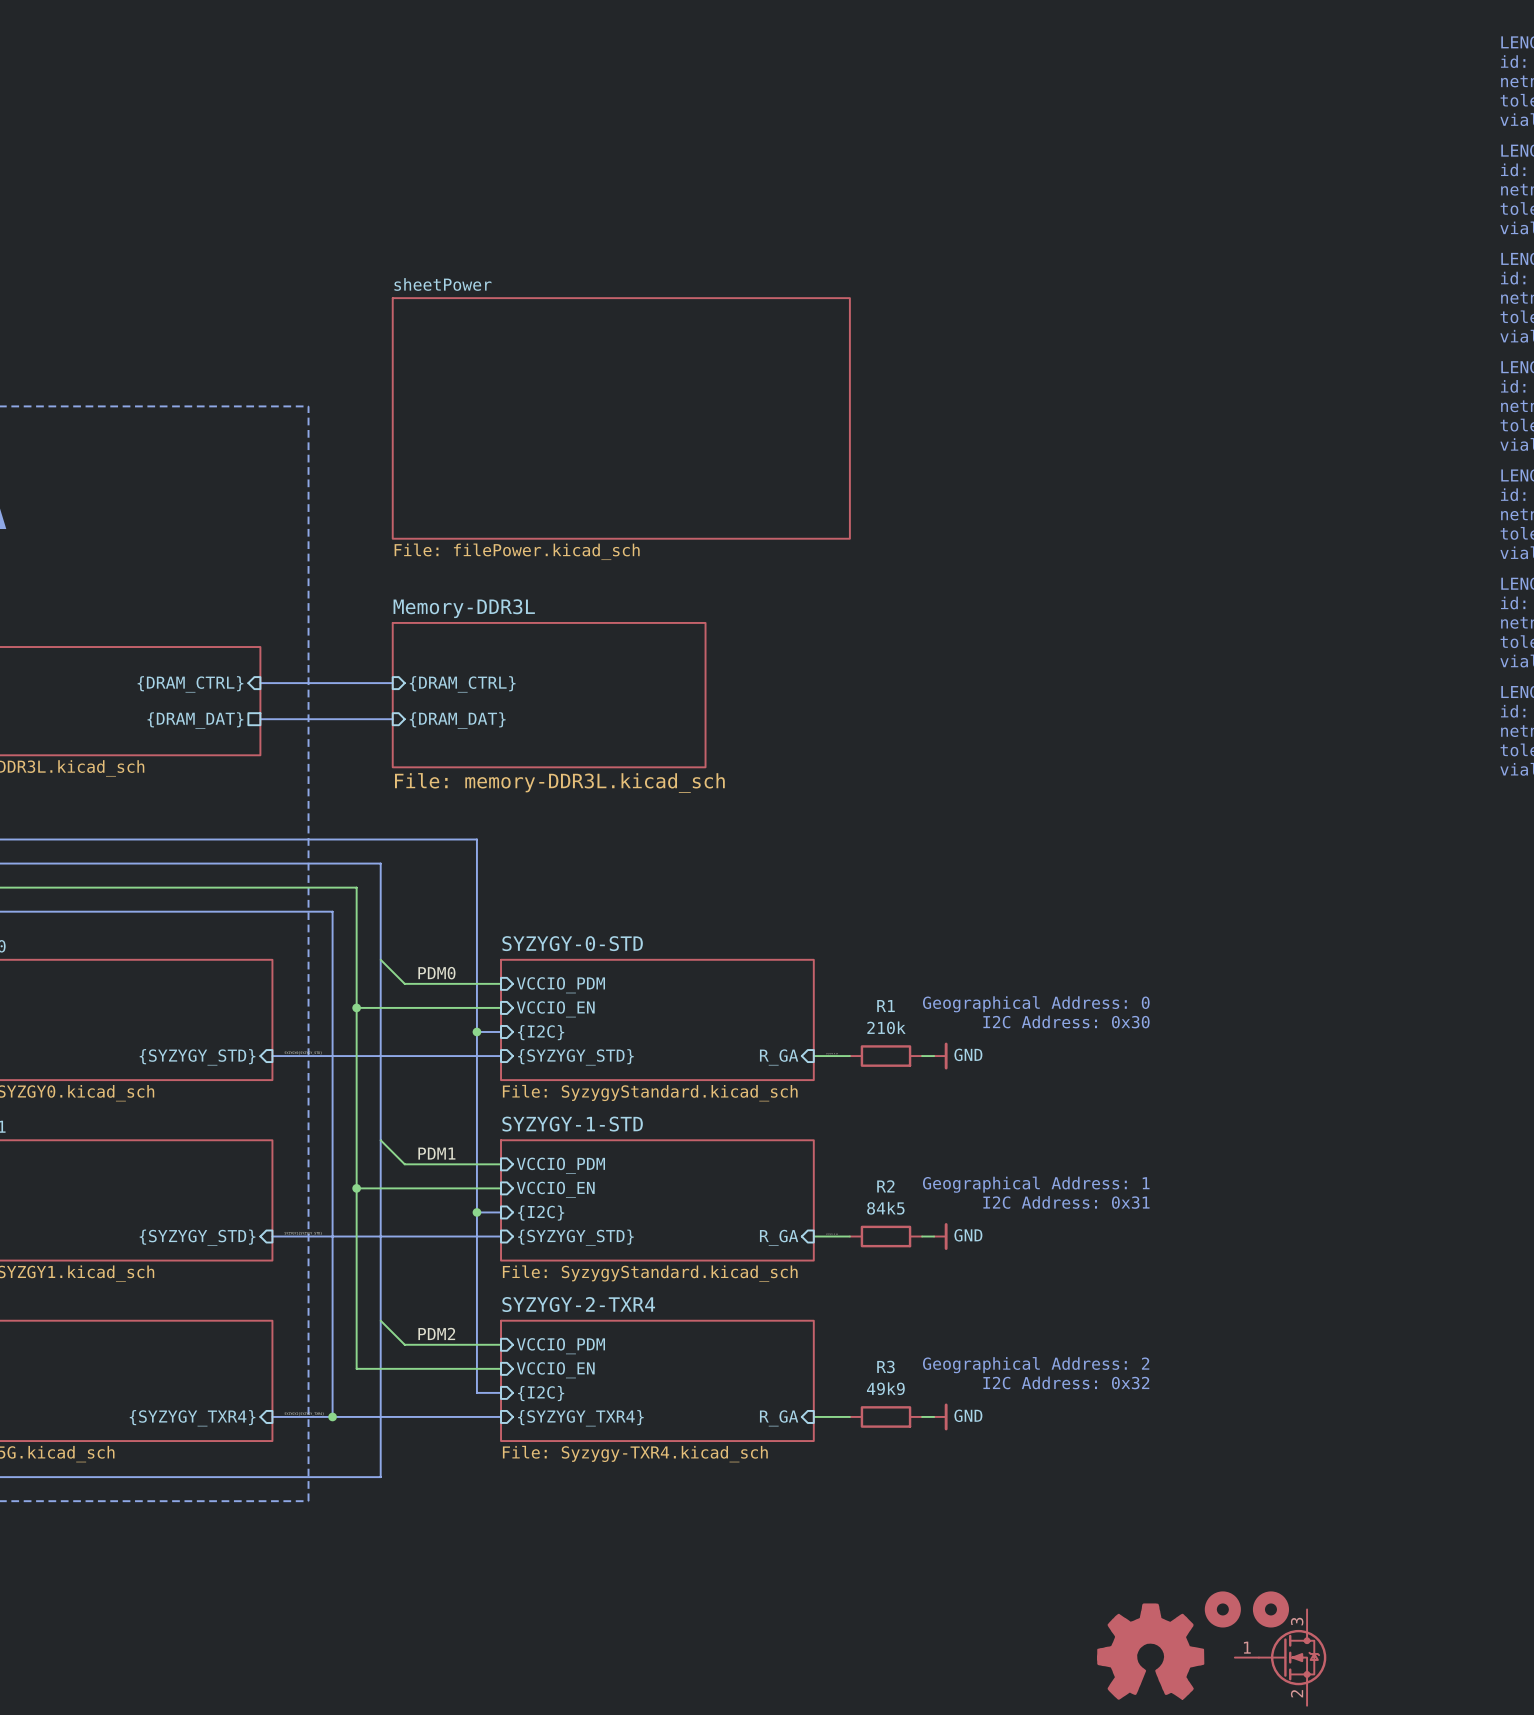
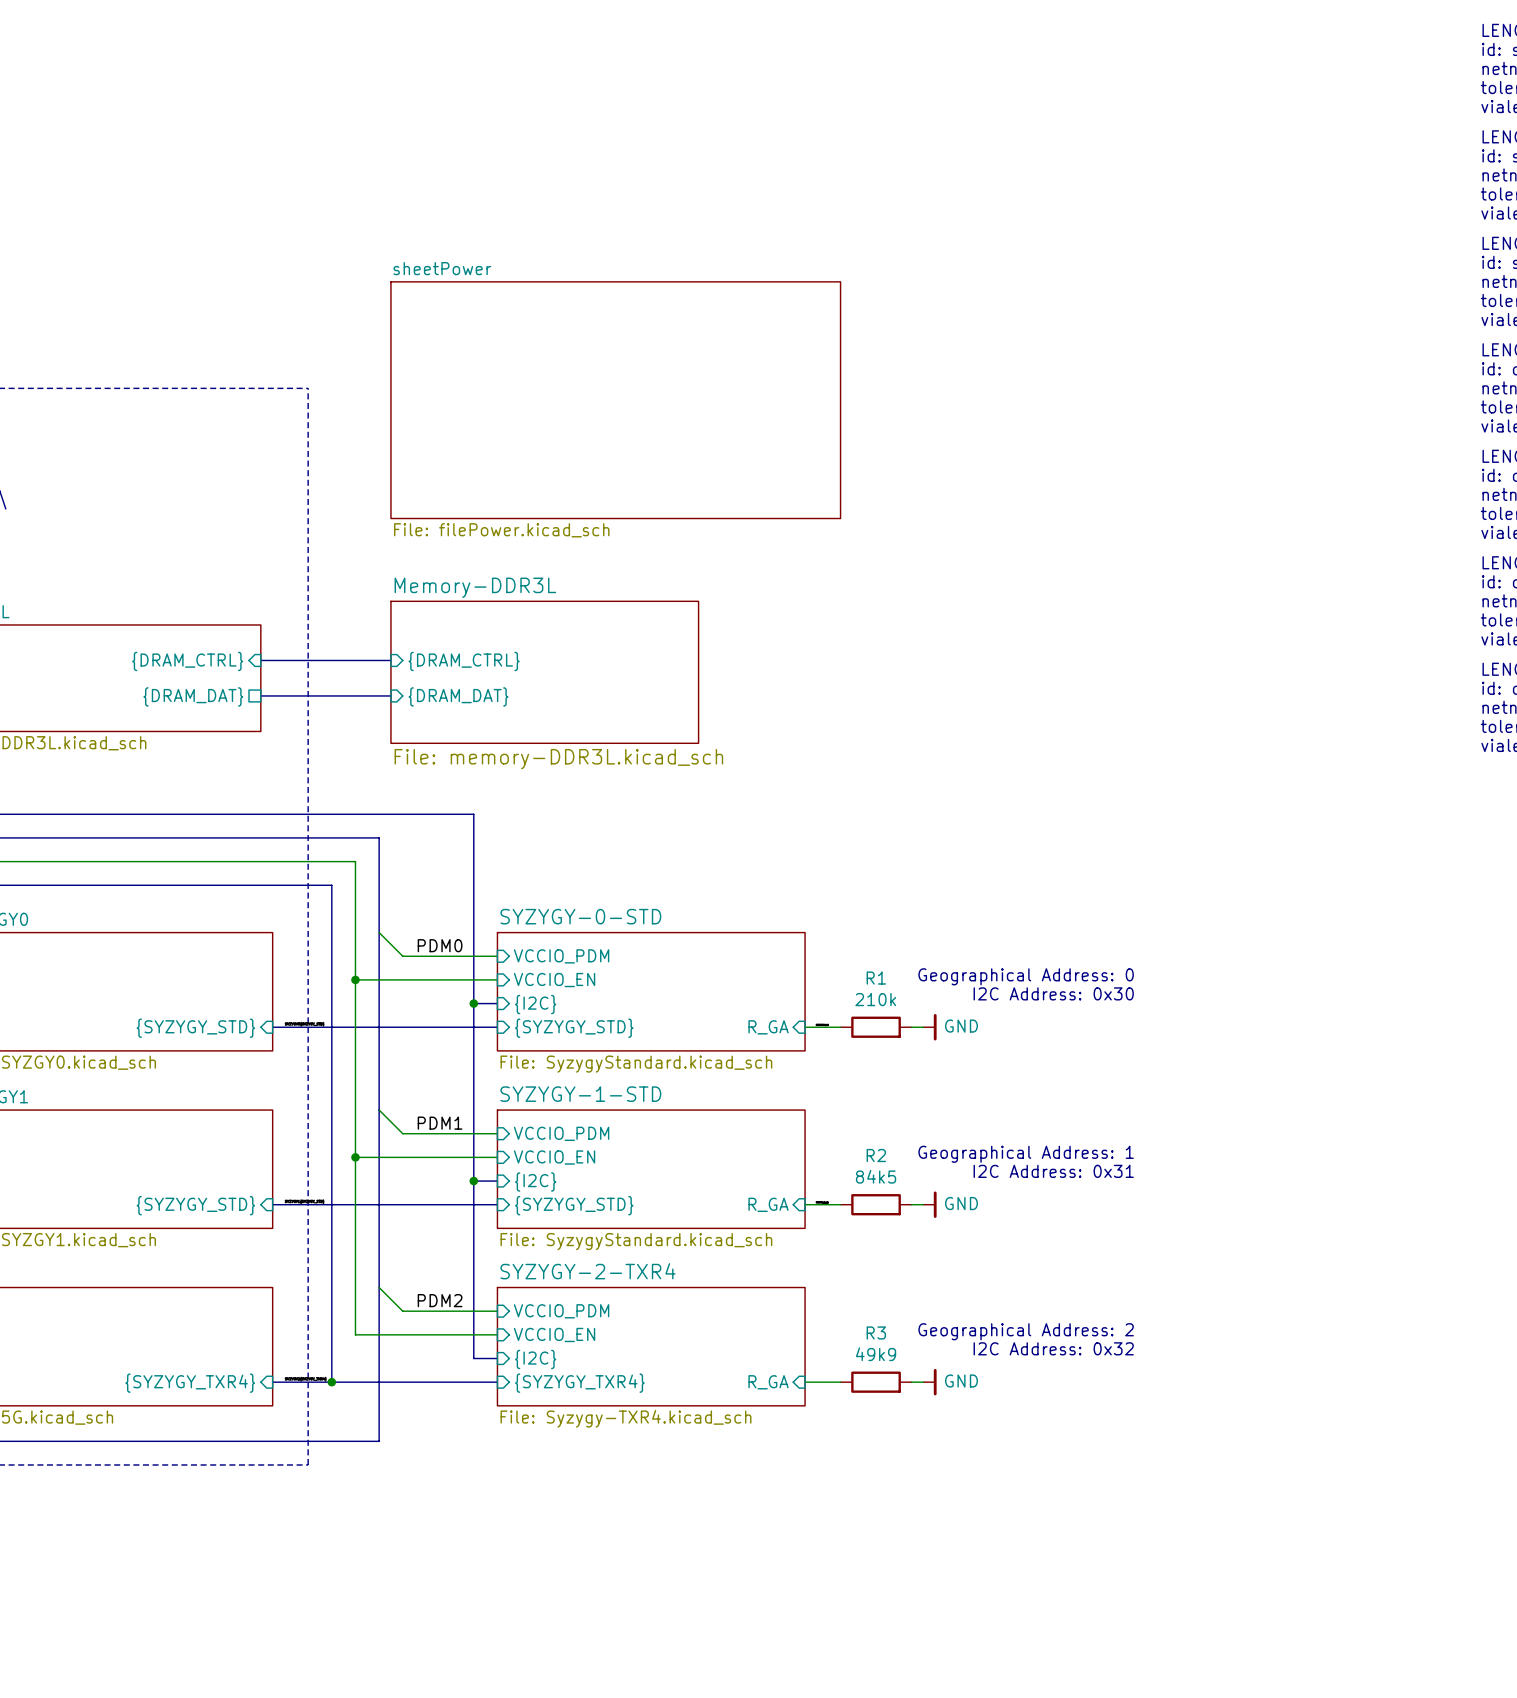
part: (1222, 1609) -> none
part: (1270, 1609) -> none
part: (1150, 1651) -> none
part: (1280, 1657) -> none

